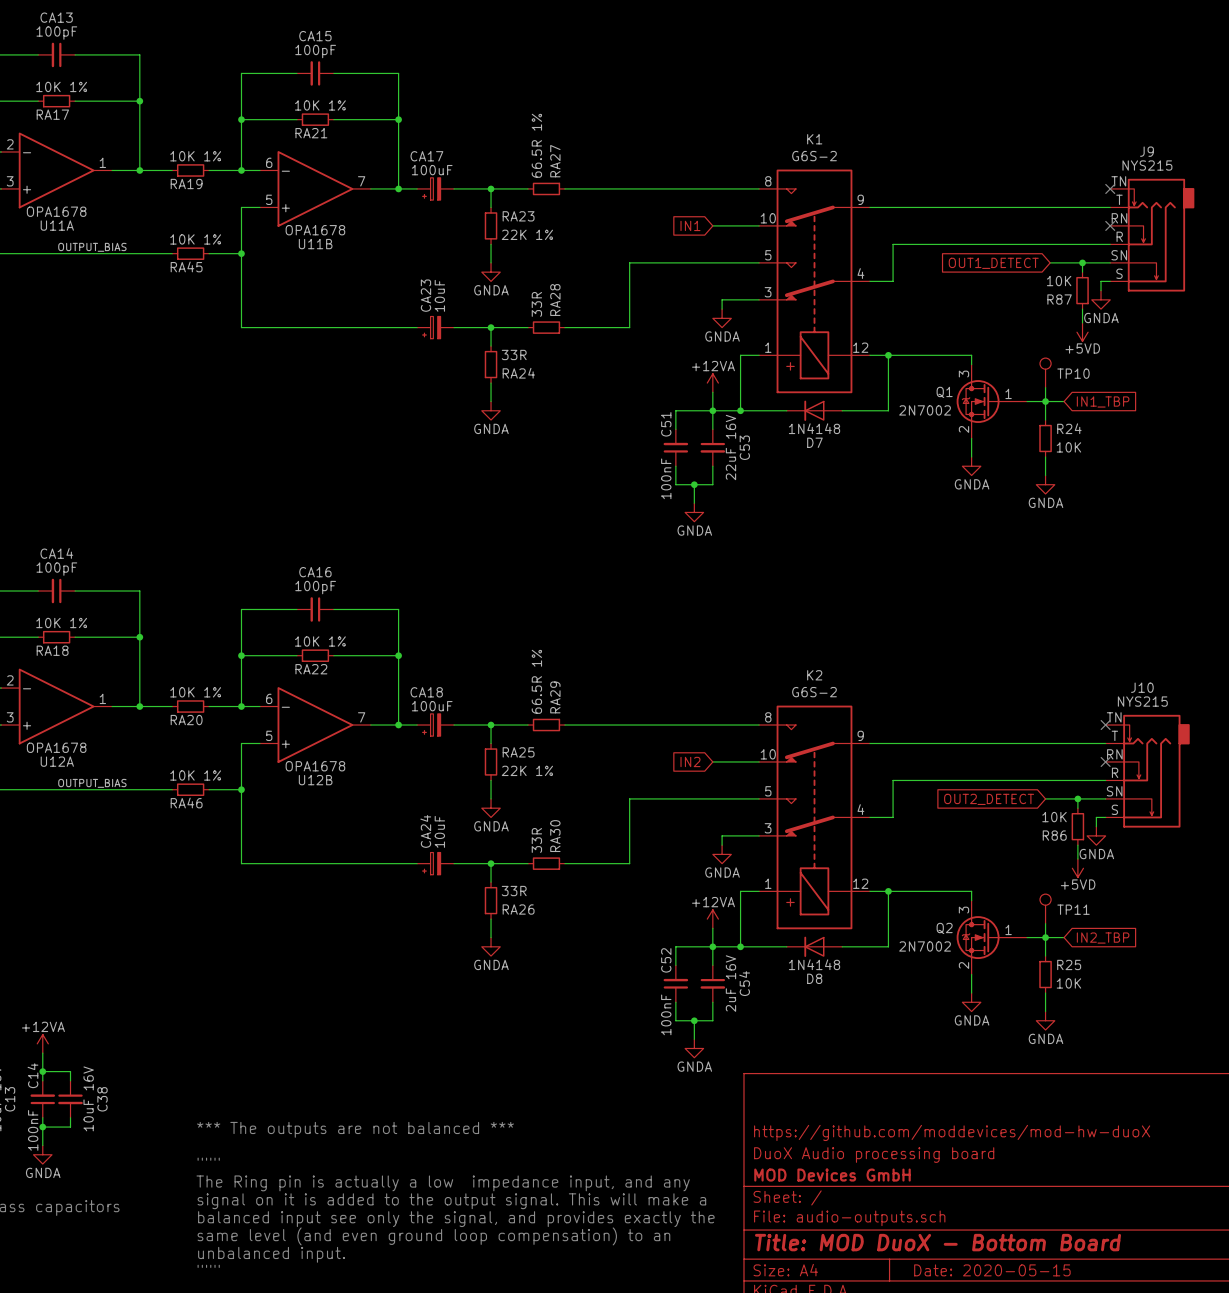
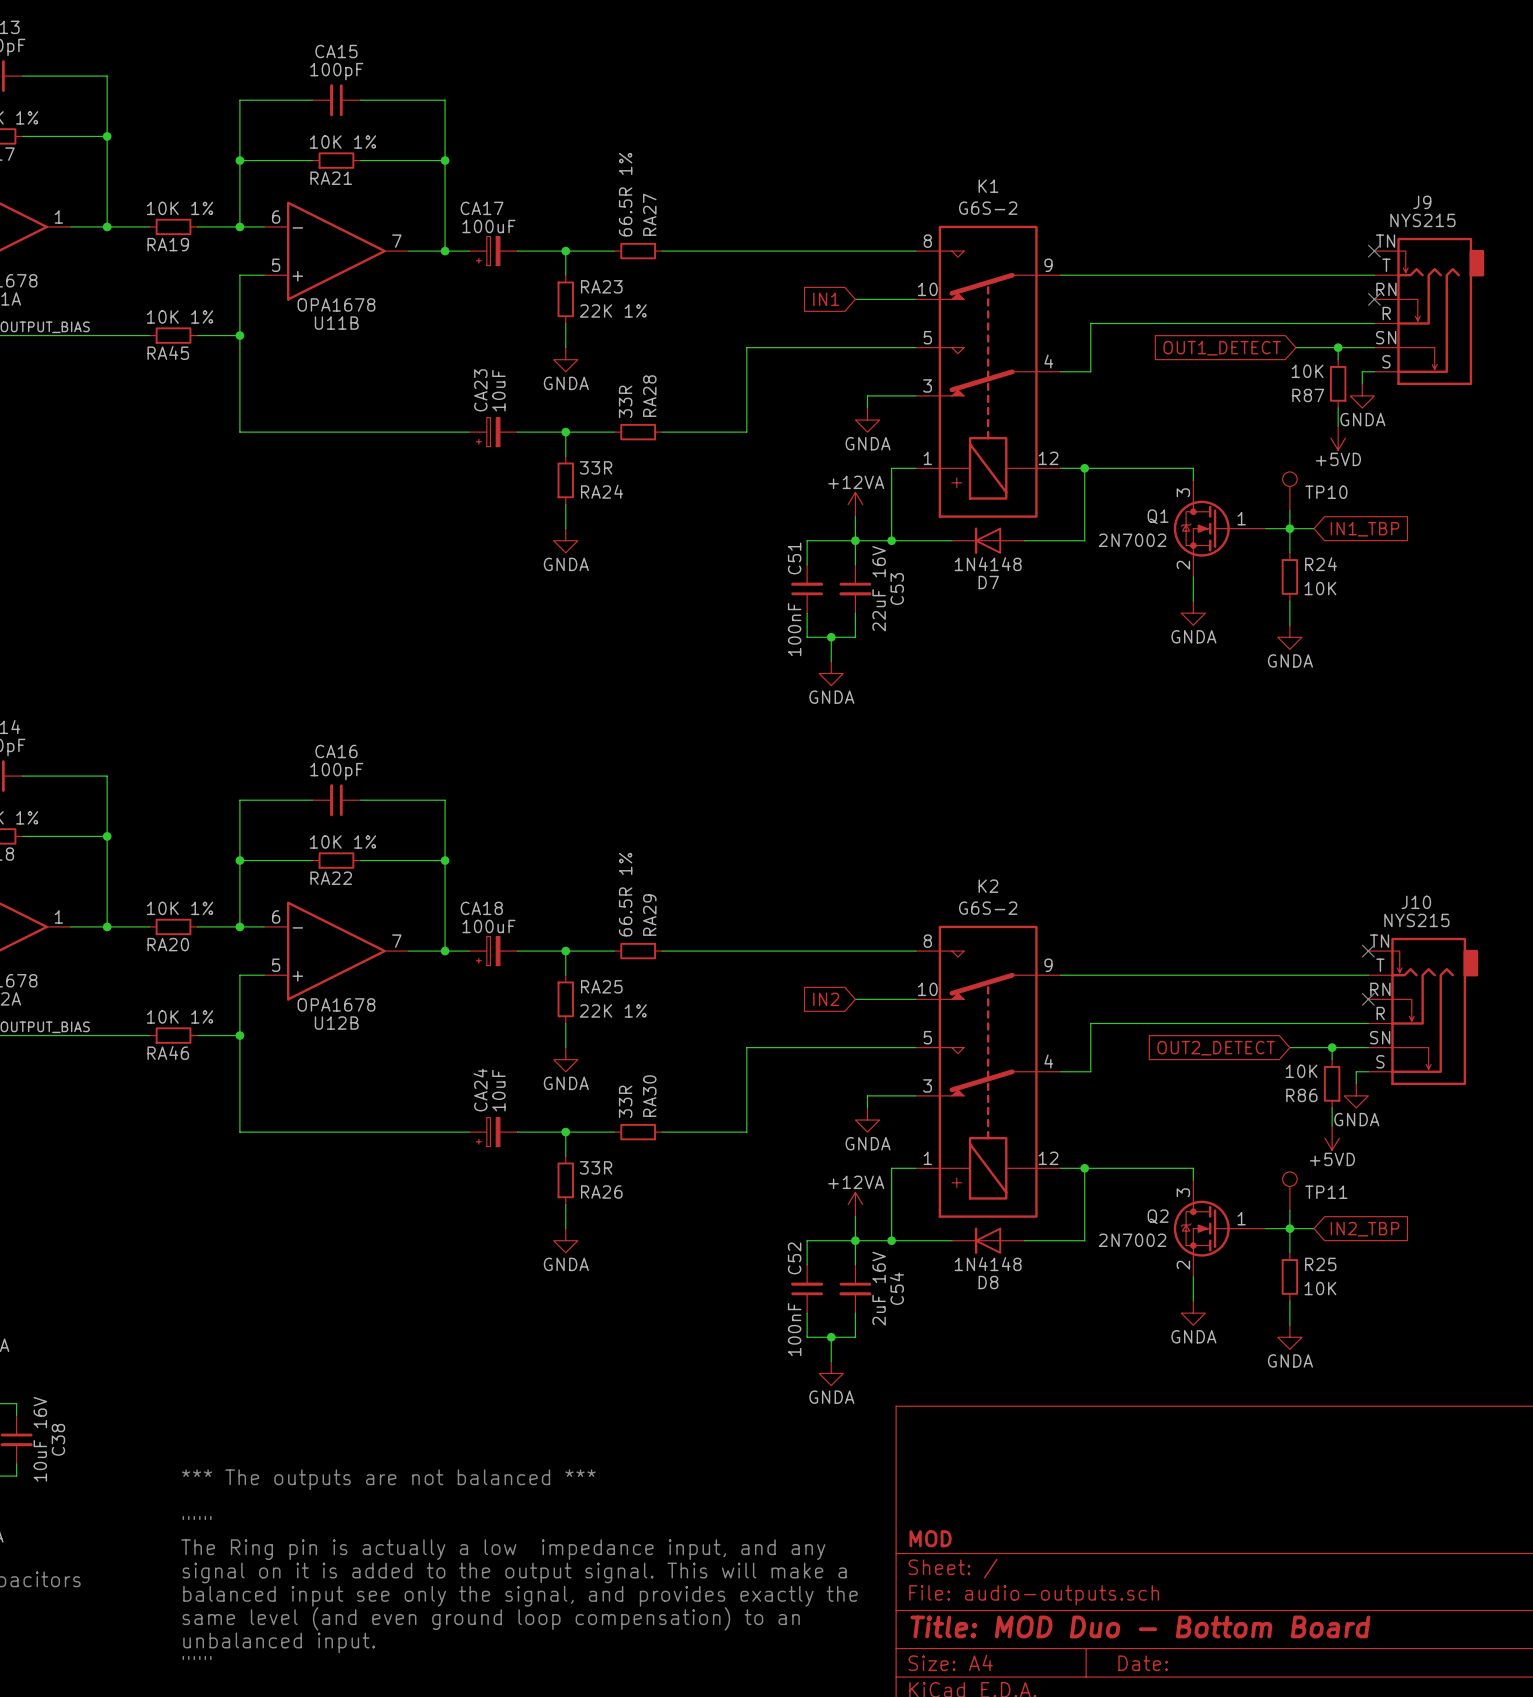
title block: https://github.com/moddevices/mod-hw-duoX (952, 1132) -> none
title block: DuoX Audio processing board (874, 1155) -> none
title block: MOD Devices GmbH (832, 1175) -> MOD (930, 1538)
title block: Title: MOD DuoX - Bottom Board (937, 1242) -> Title: MOD Duo - Bottom Board (1140, 1626)
title block: Date: 2020-05-15 (992, 1270) -> Date: (1143, 1663)

